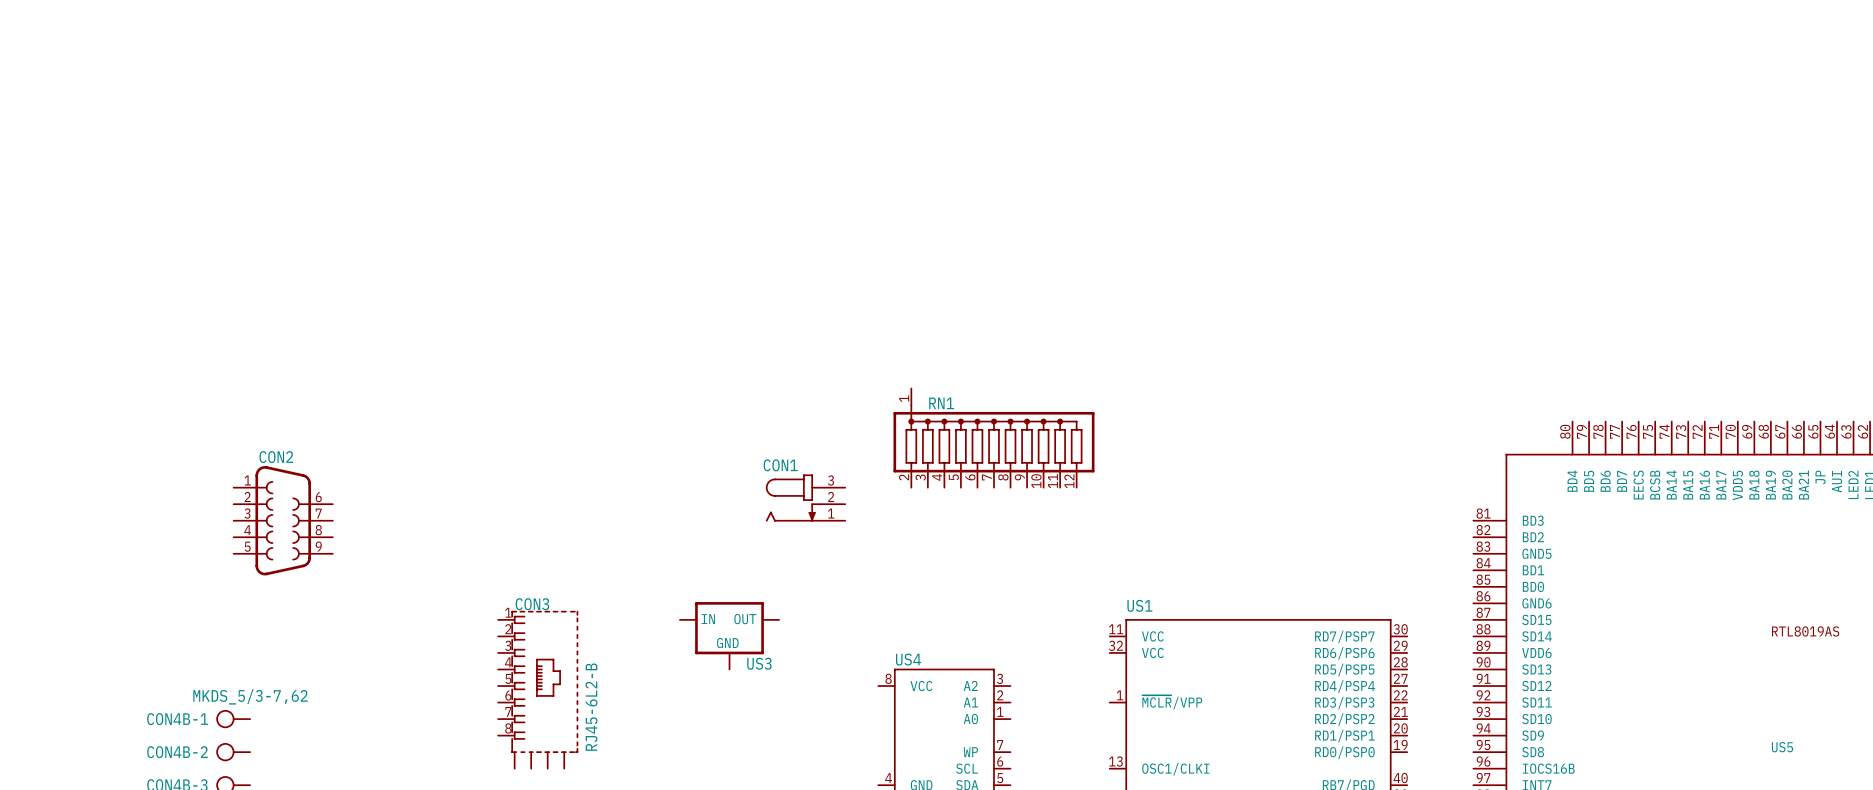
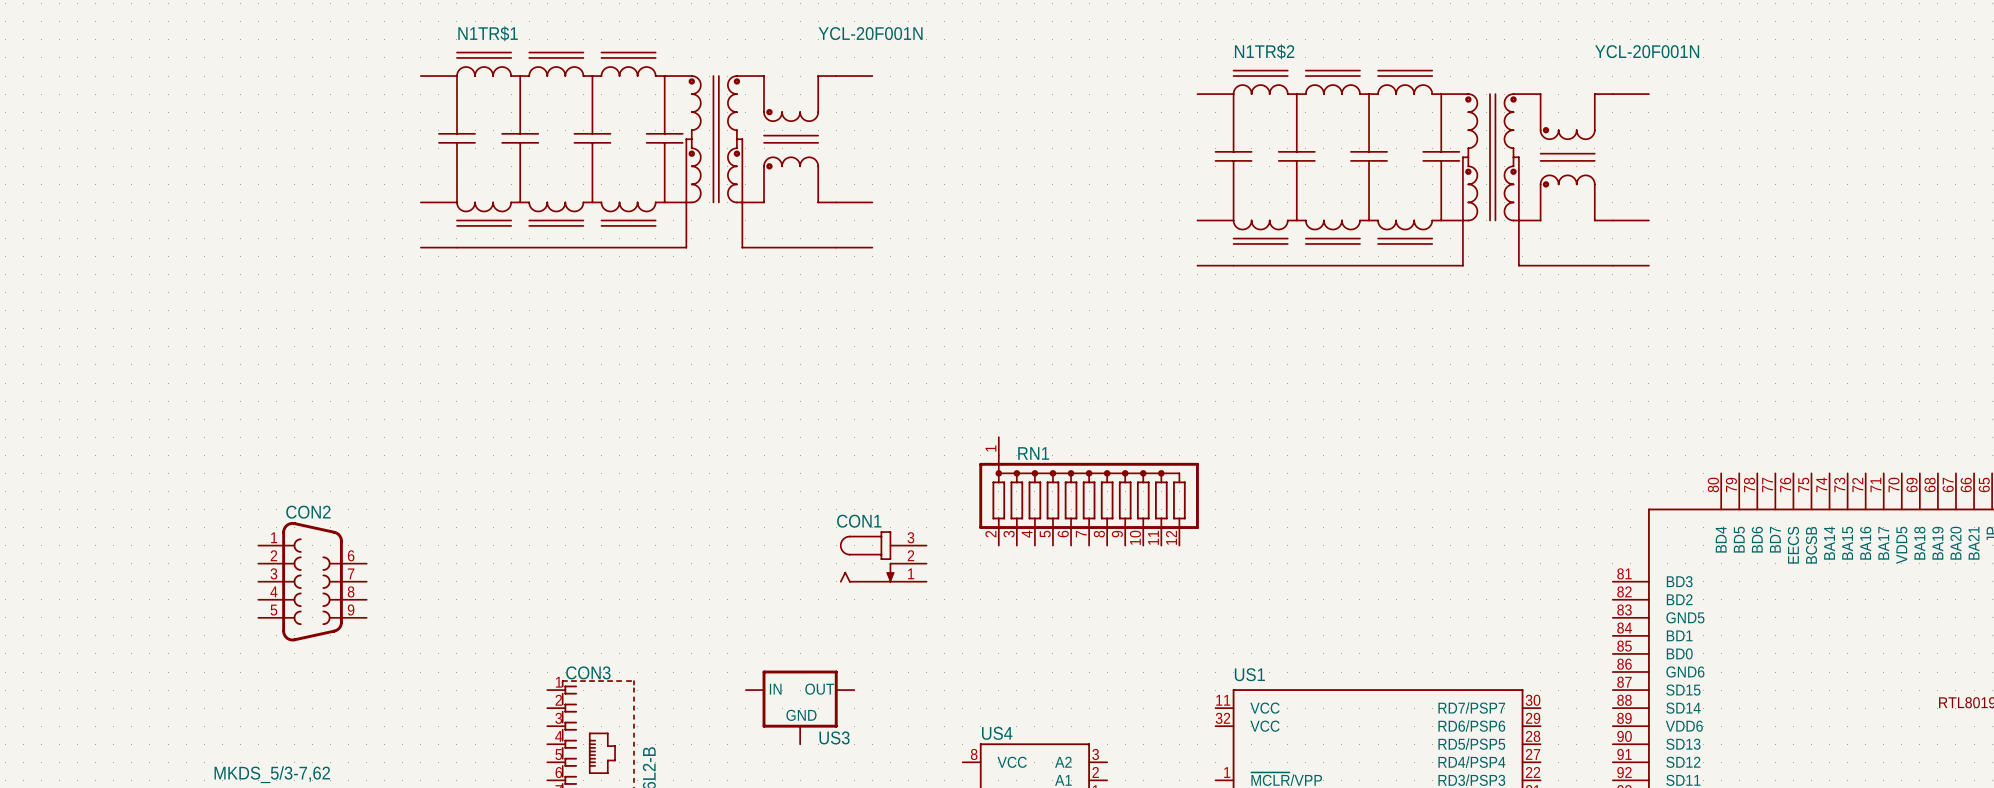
N1TR$1: none -> YCL-20F001N (646, 150)
N1TR$2: none -> YCL-20F001N (1423, 168)

